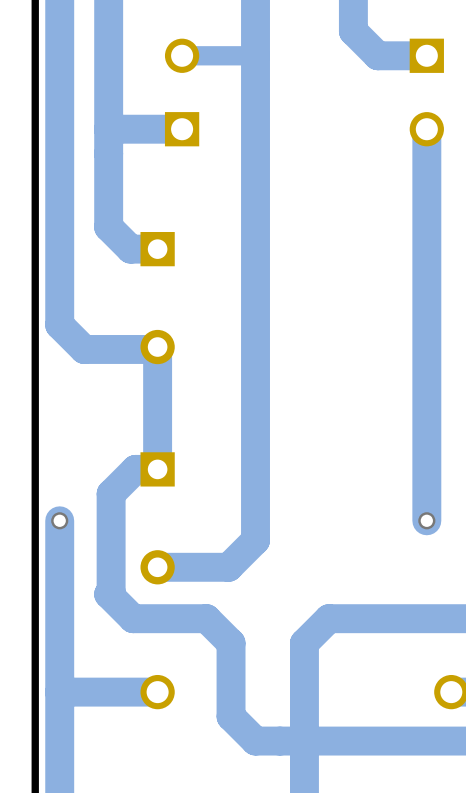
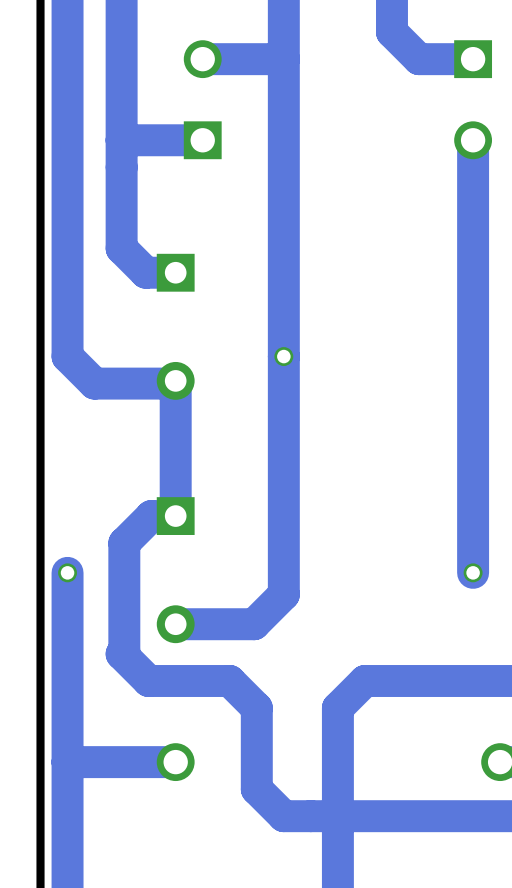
track width: thin (255, 55) (182, 55) -> thick (283, 59) (202, 59)
via: none -> (283, 356)

